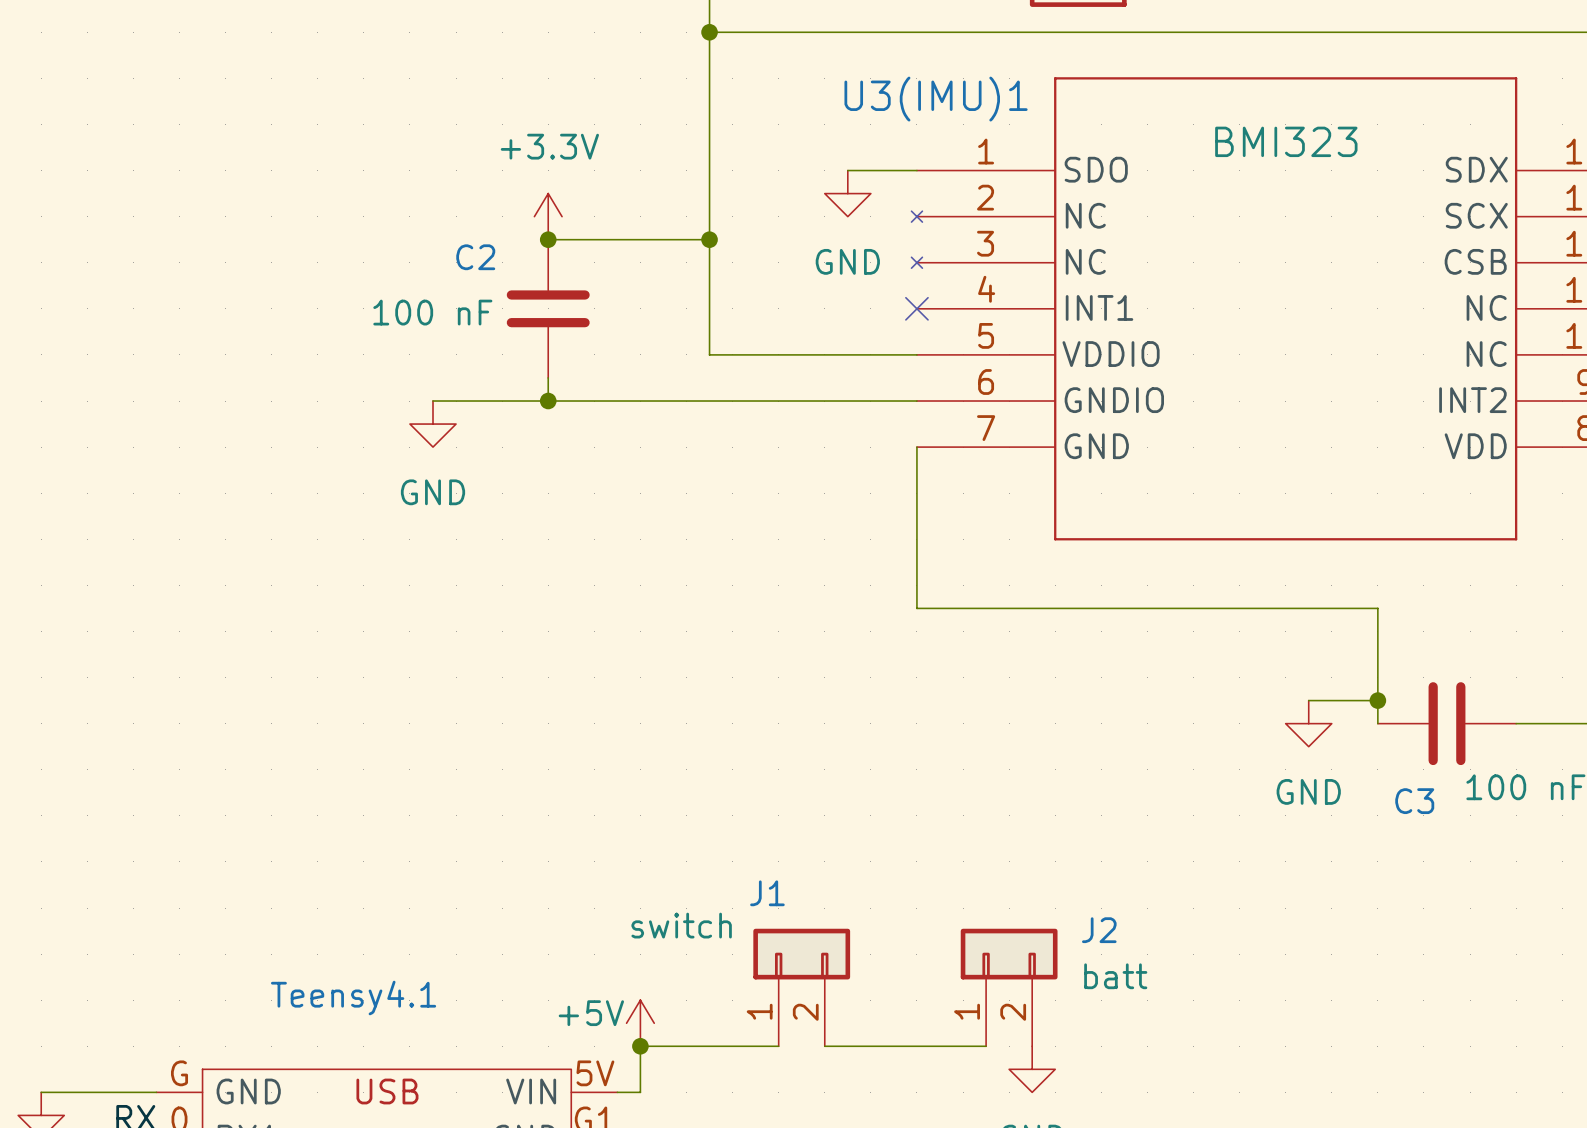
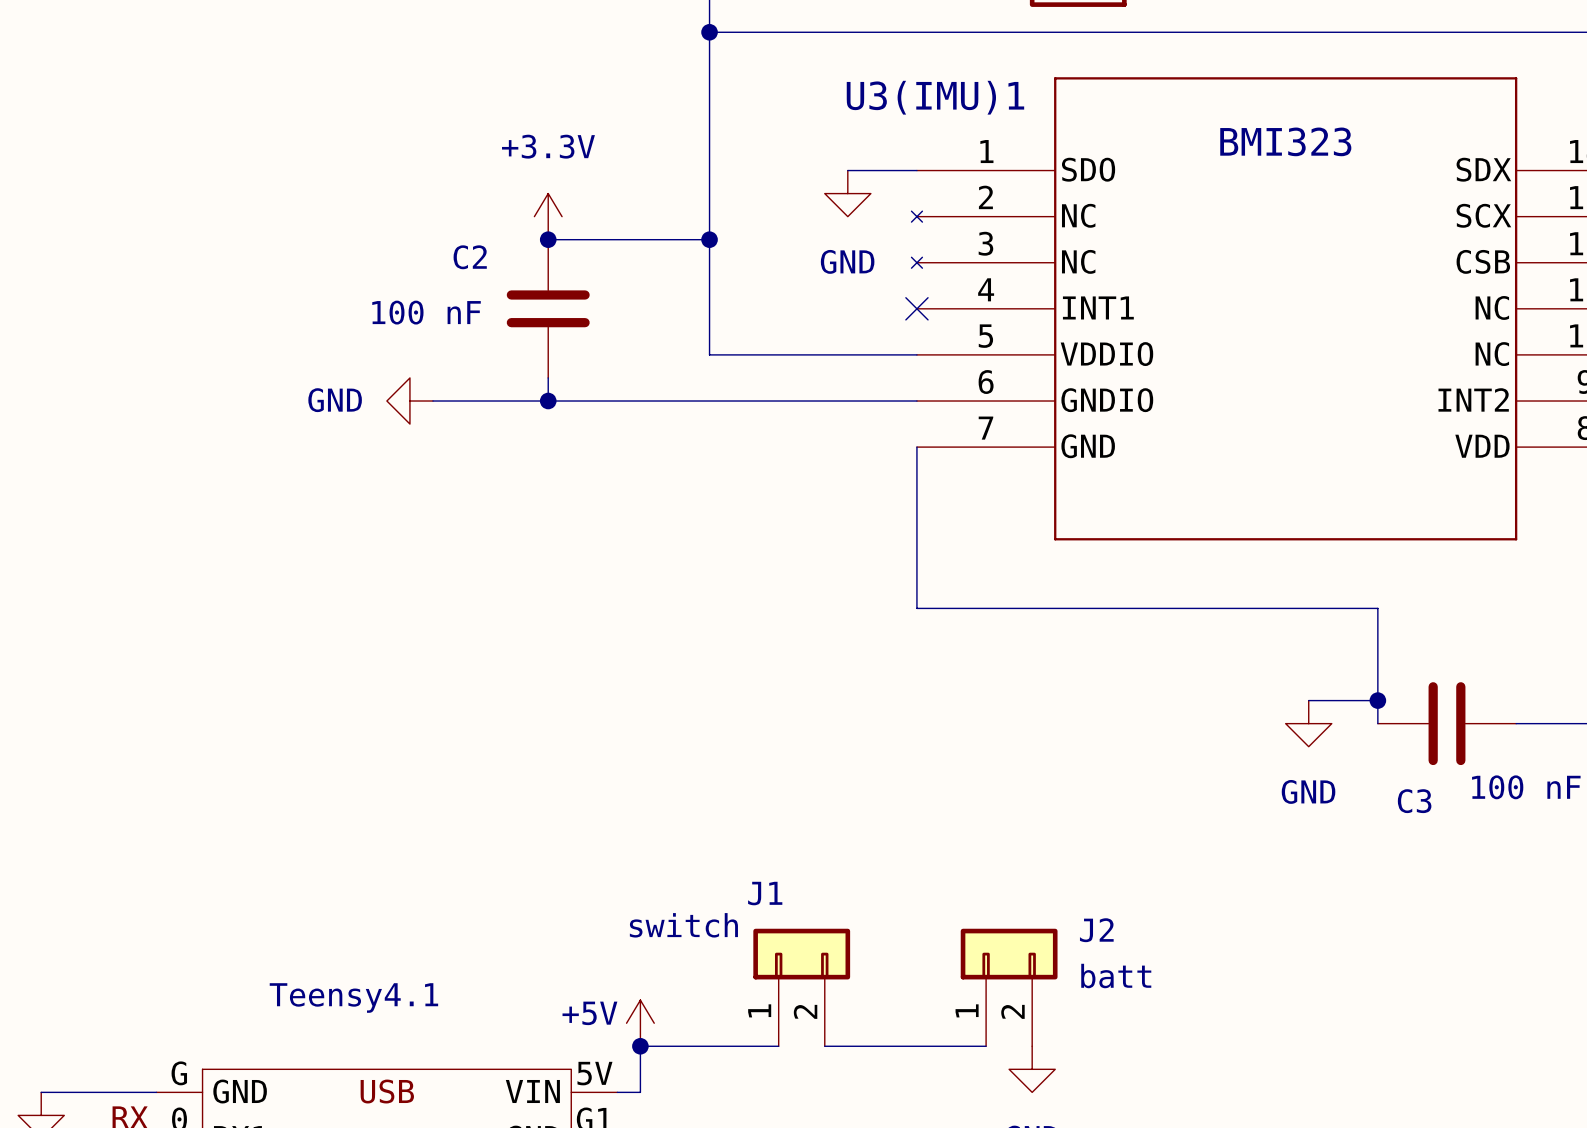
power symbol rotation: 0° (433, 424) -> 90° clockwise (409, 401)
power symbol position: GND (433, 424) -> GND (409, 401)

